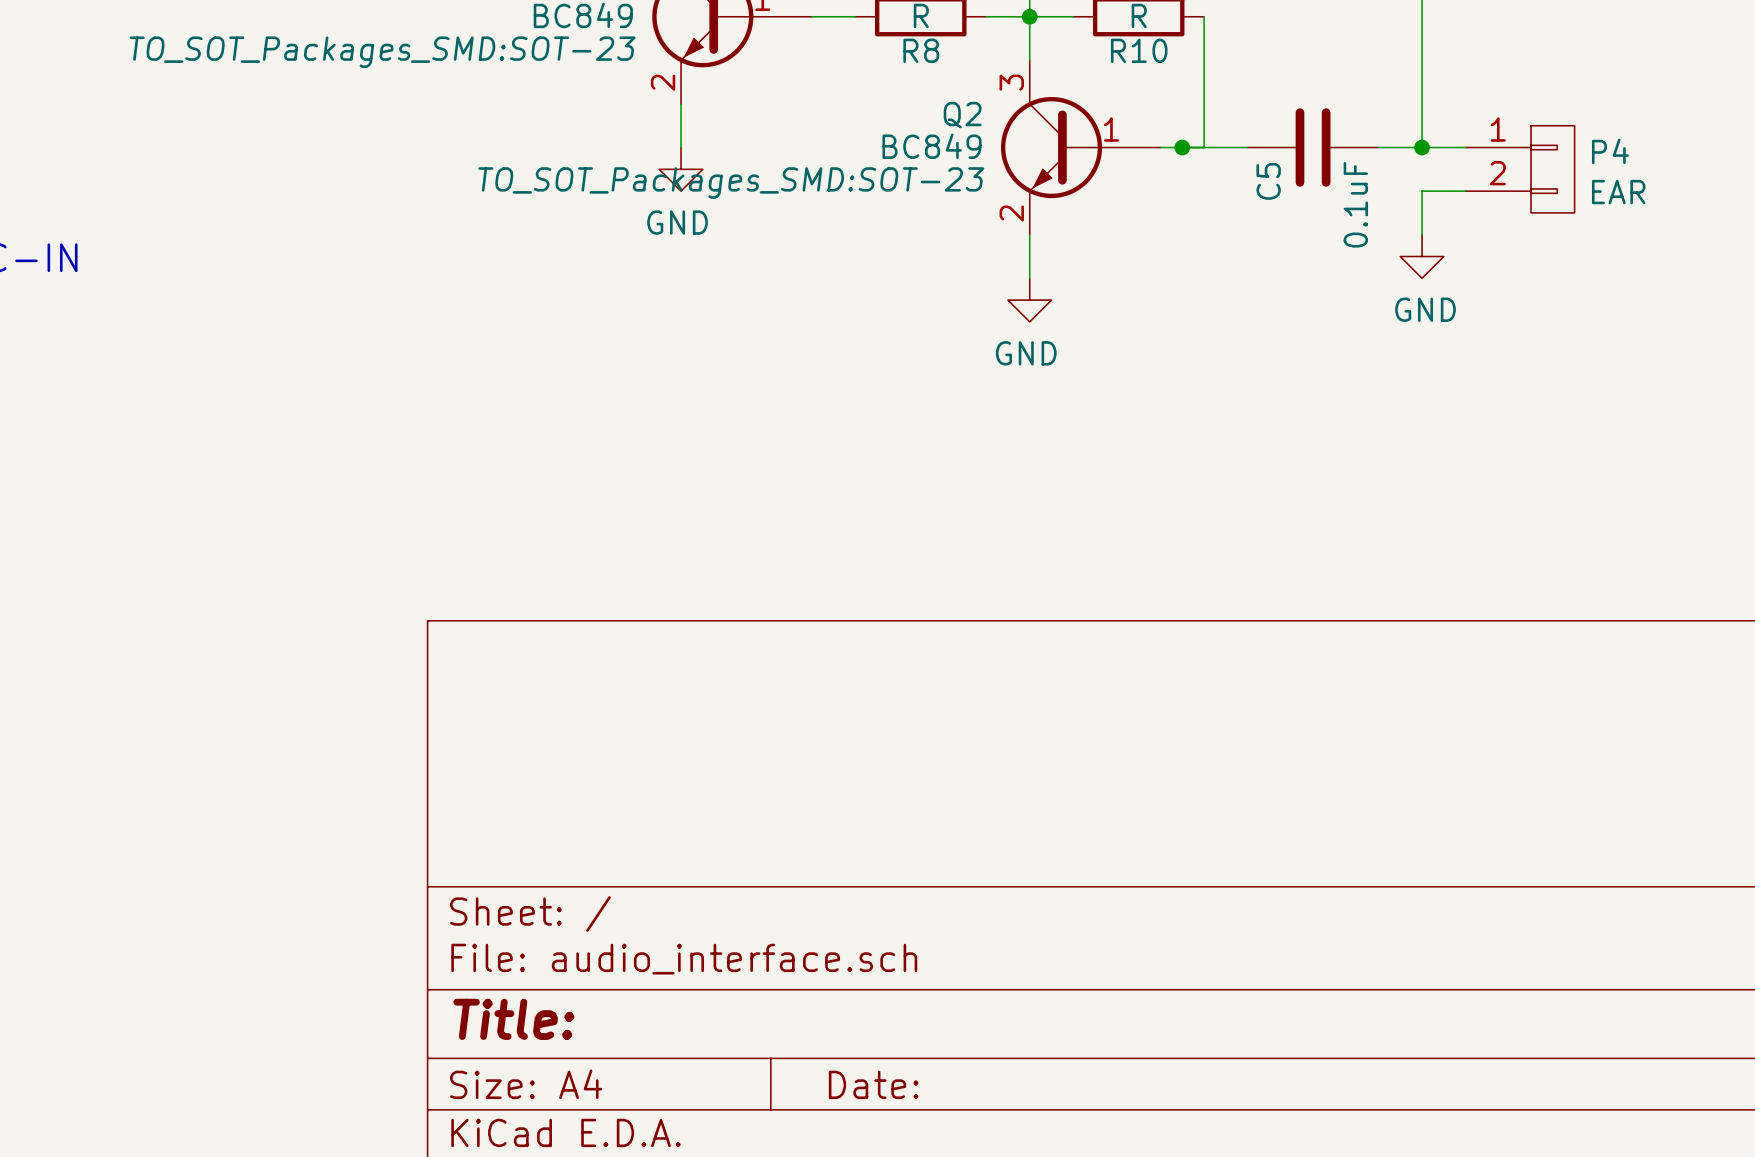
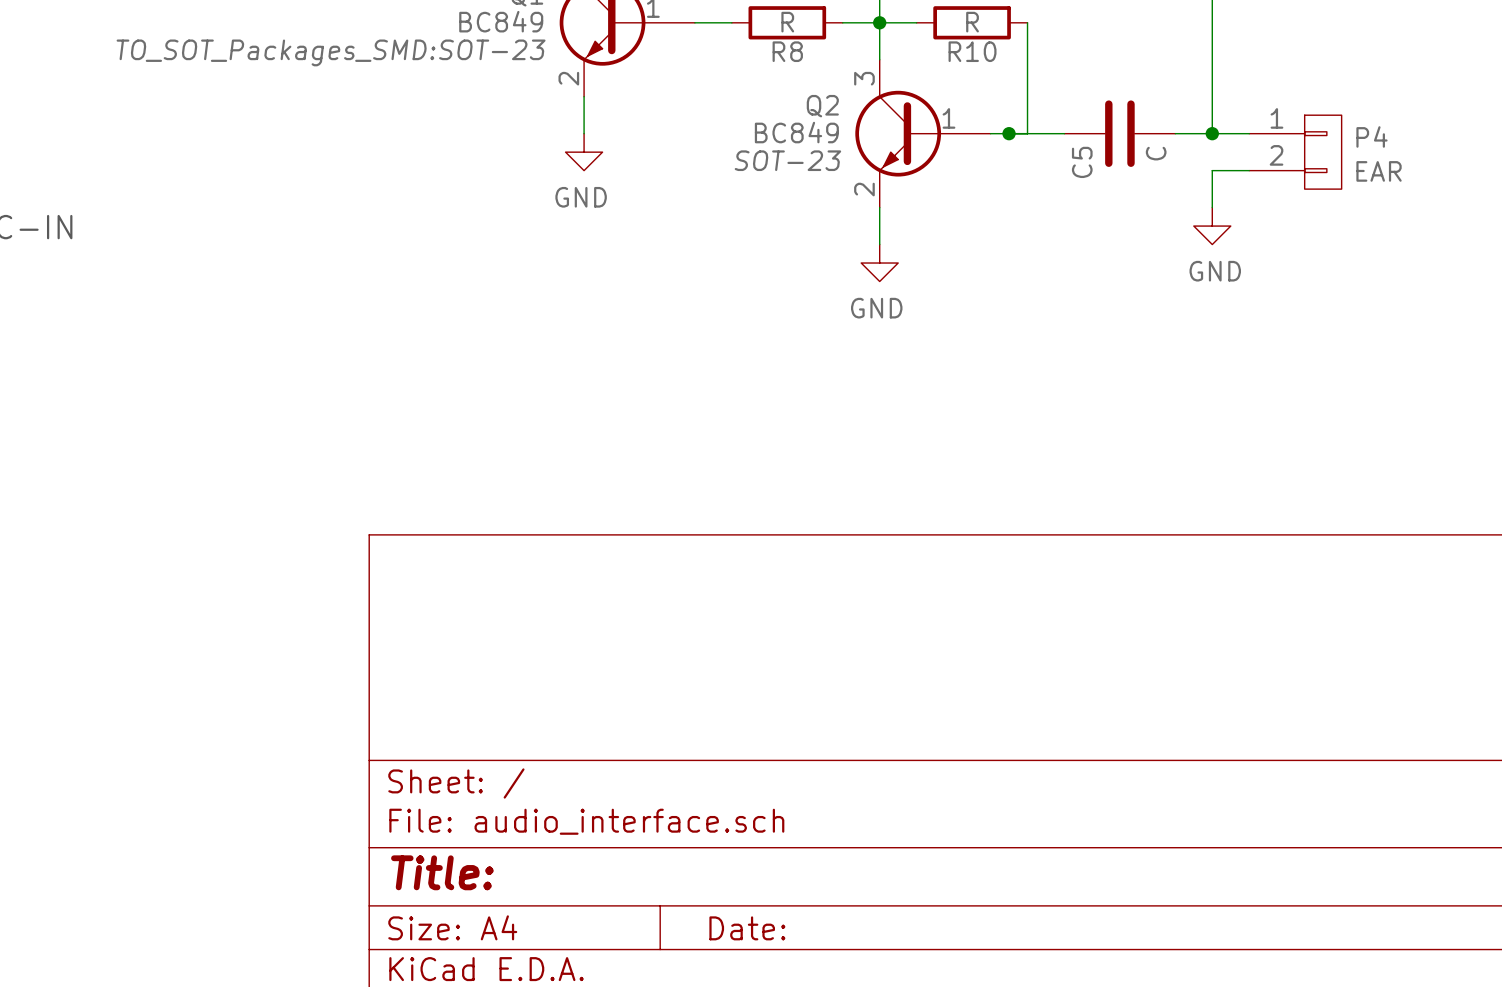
Q2 text: TO_SOT_Packages_SMD:SOT-23 (731, 183) -> SOT-23 (787, 160)
C5 value: 0.1uF (1355, 204) -> C (1156, 153)

